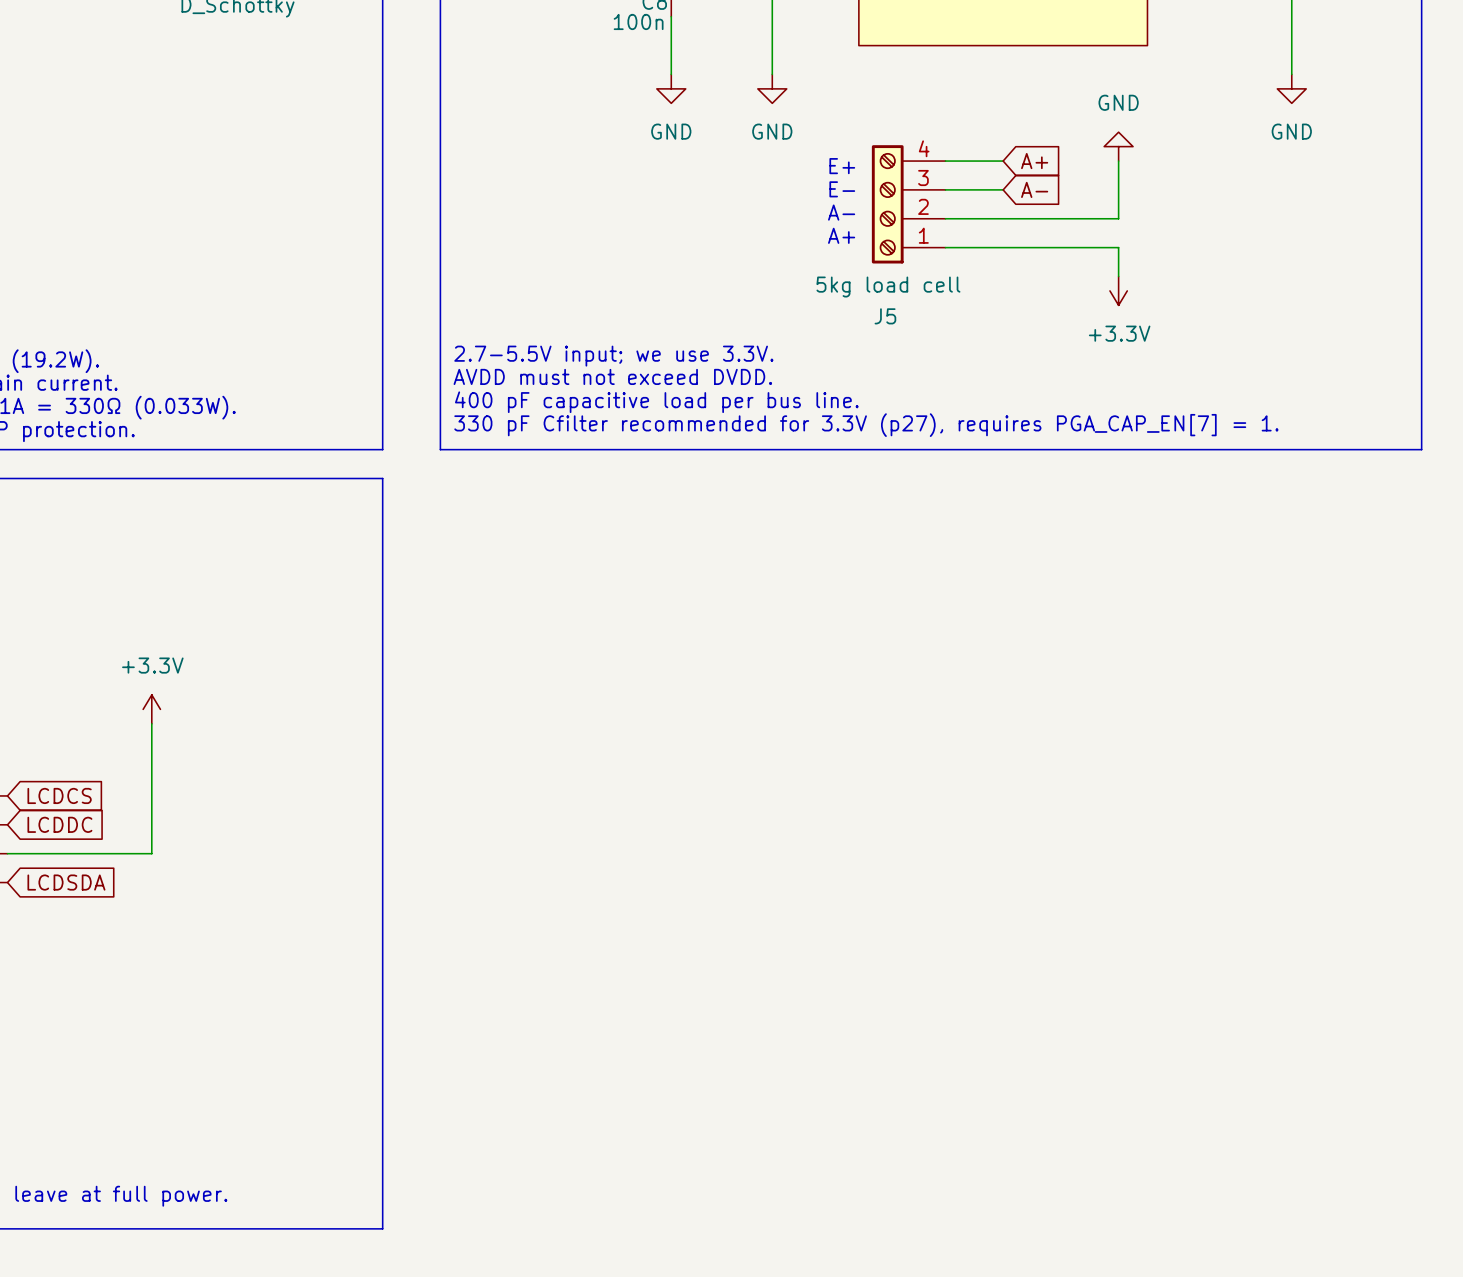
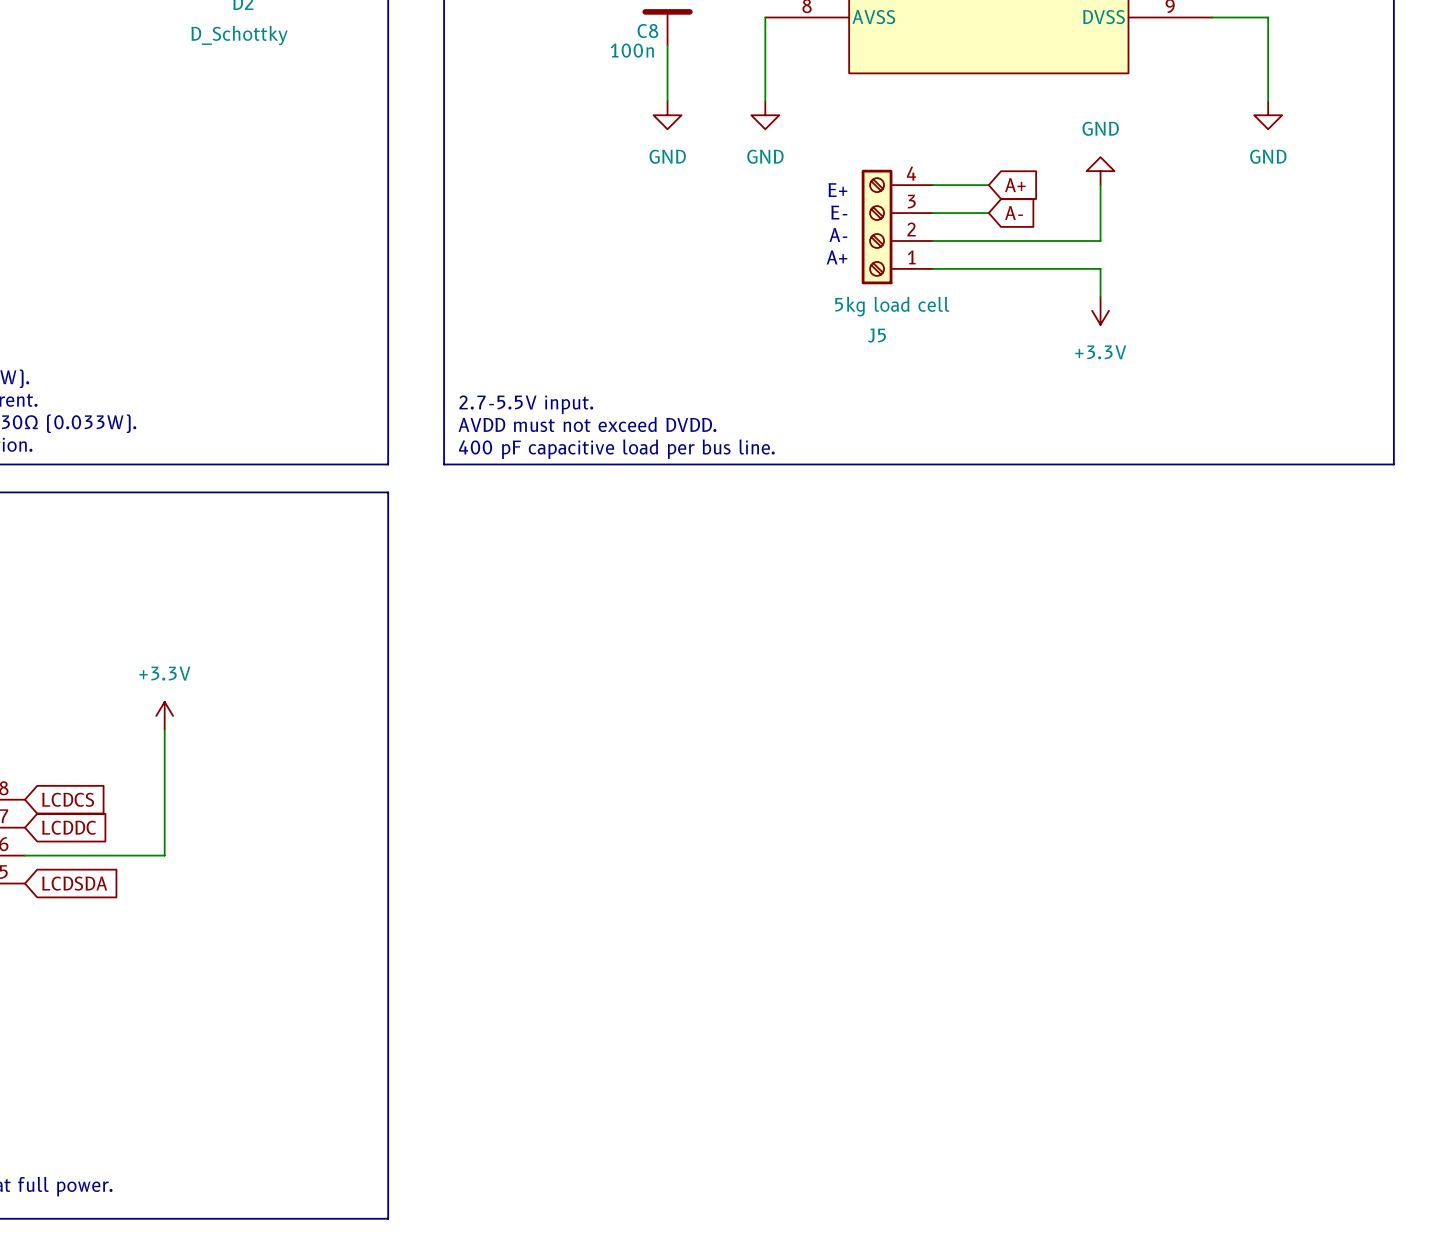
text: 2.7-5.5V input; we use 3.3V. (613, 356) -> none
text position: AVDD must not exceed DVDD. (612, 376) -> AVDD must not exceed DVDD. (587, 424)
text: none -> 2.7-5.5V input. (526, 404)
text position: 400 pF capacitive load per bus line. (656, 402) -> 400 pF capacitive load per bus line. (616, 449)
text: 330 pF Cfilter recommended for 3.3V (p27), requires PGA_CAP_EN[7] = 1. (866, 425) -> none

